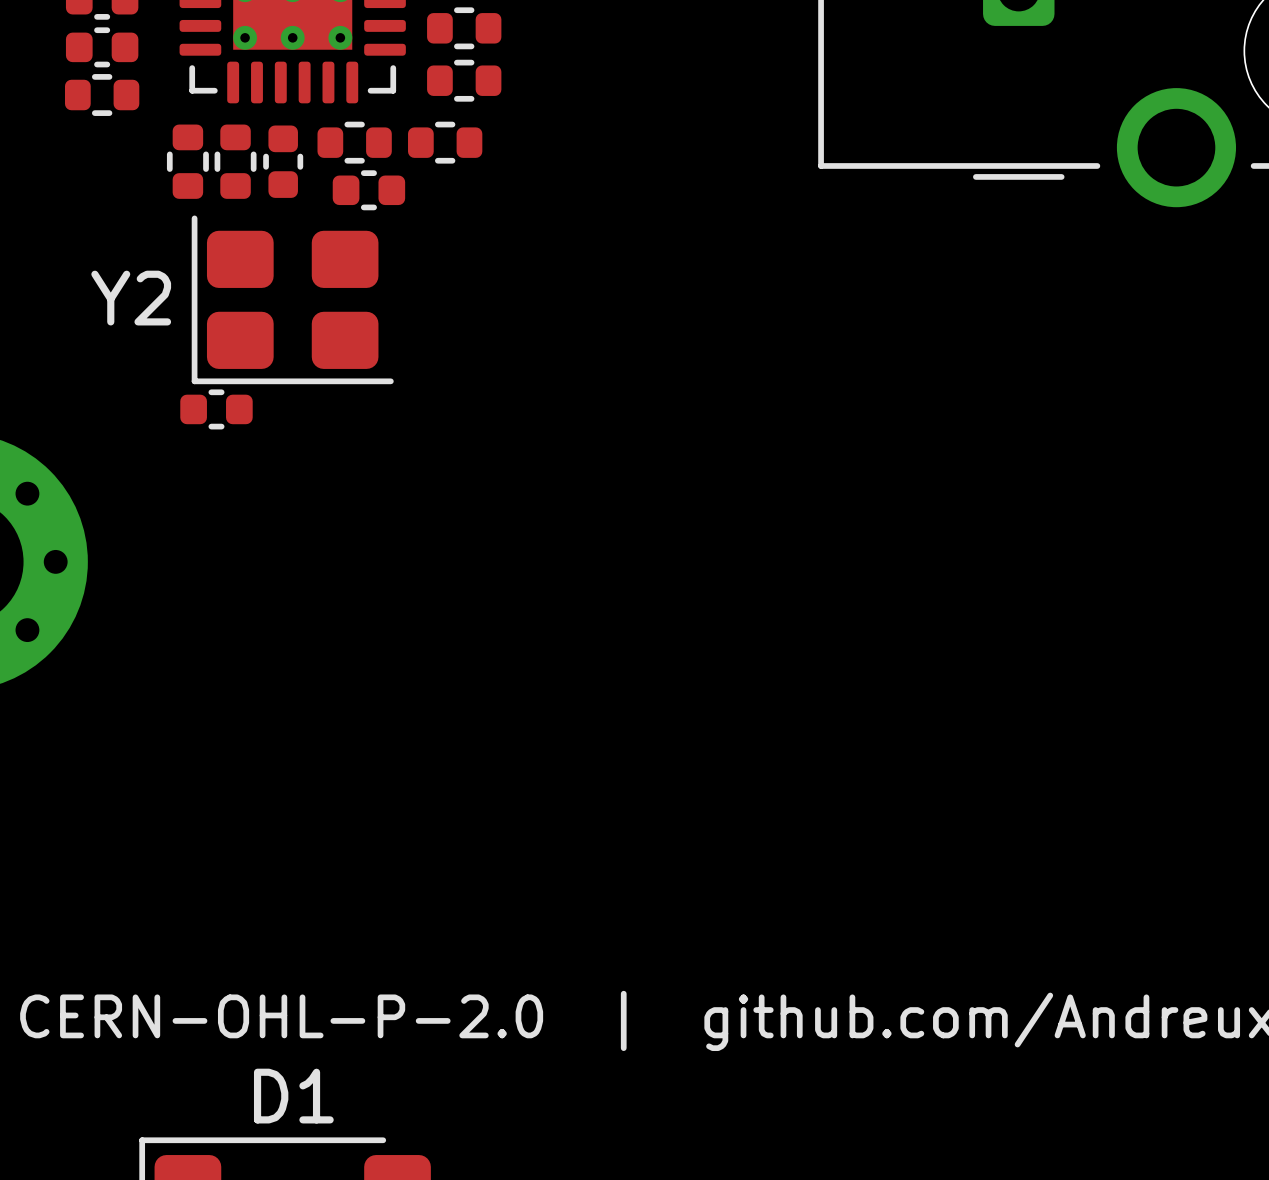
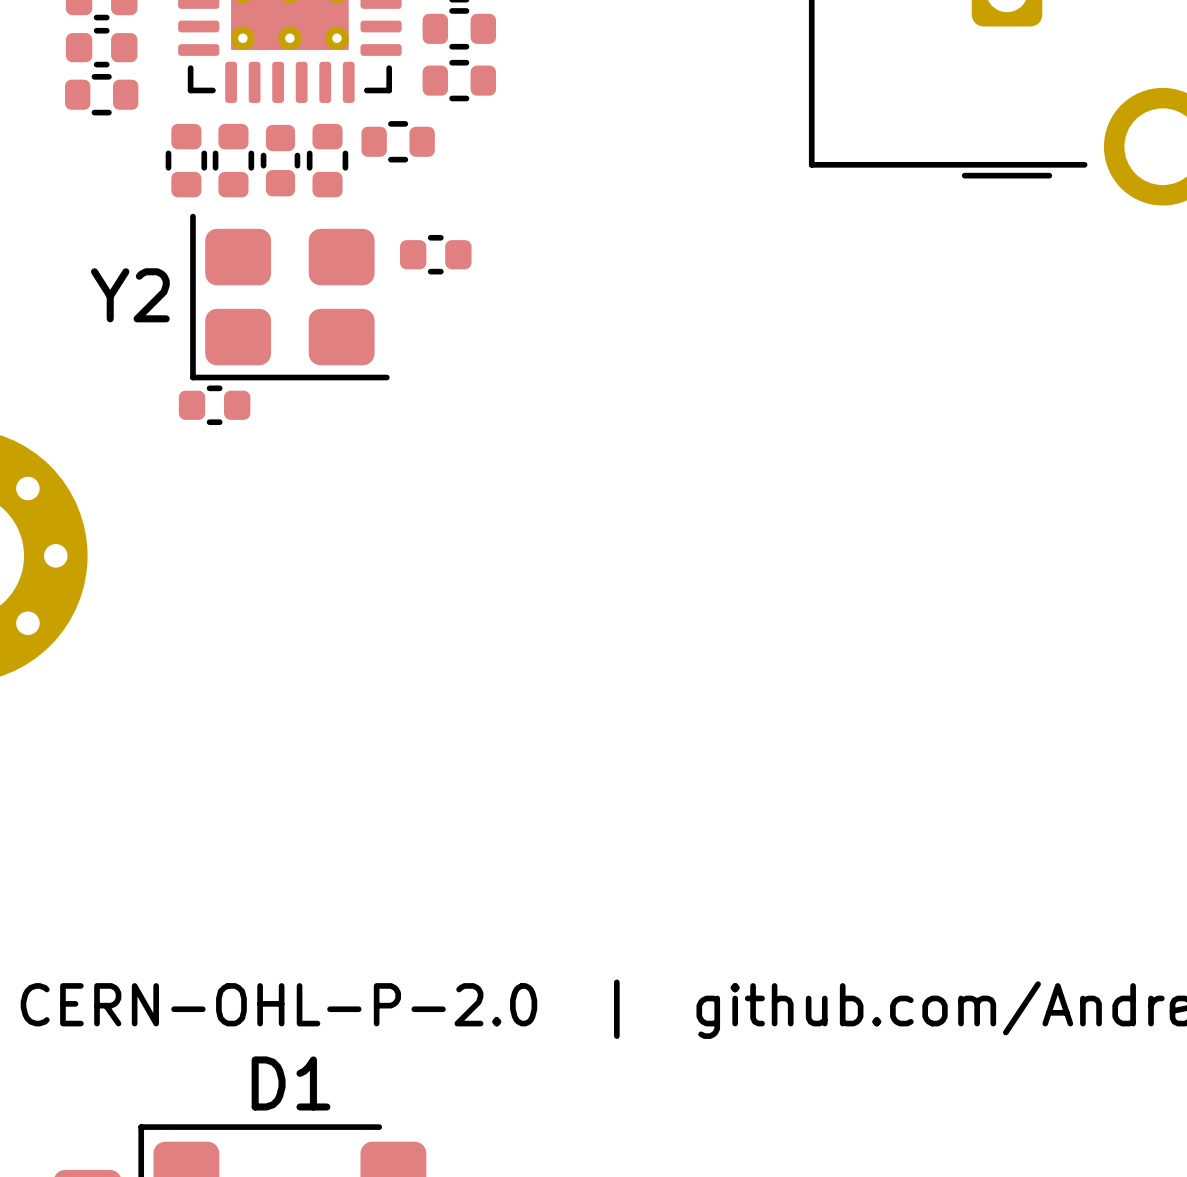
part: (354, 142) -> none
part: none -> (398, 141)
part: (445, 142) -> none
part: none -> (327, 160)
part position: (368, 190) -> (435, 254)

